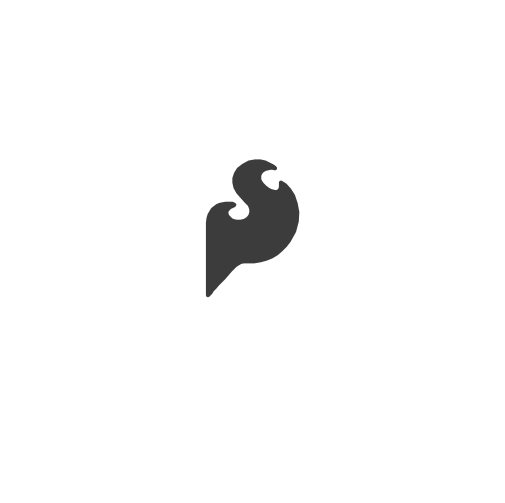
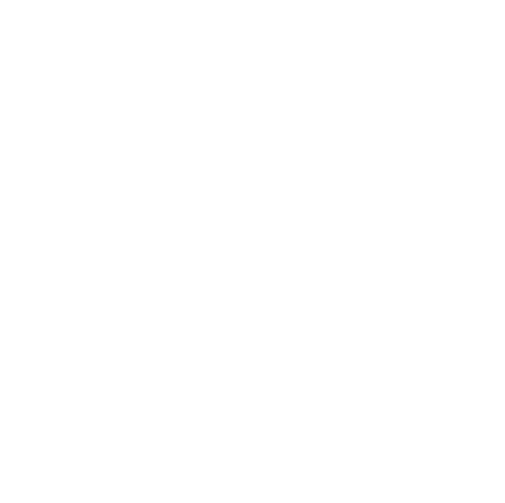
drawing: [205, 159, 300, 298] -> none

